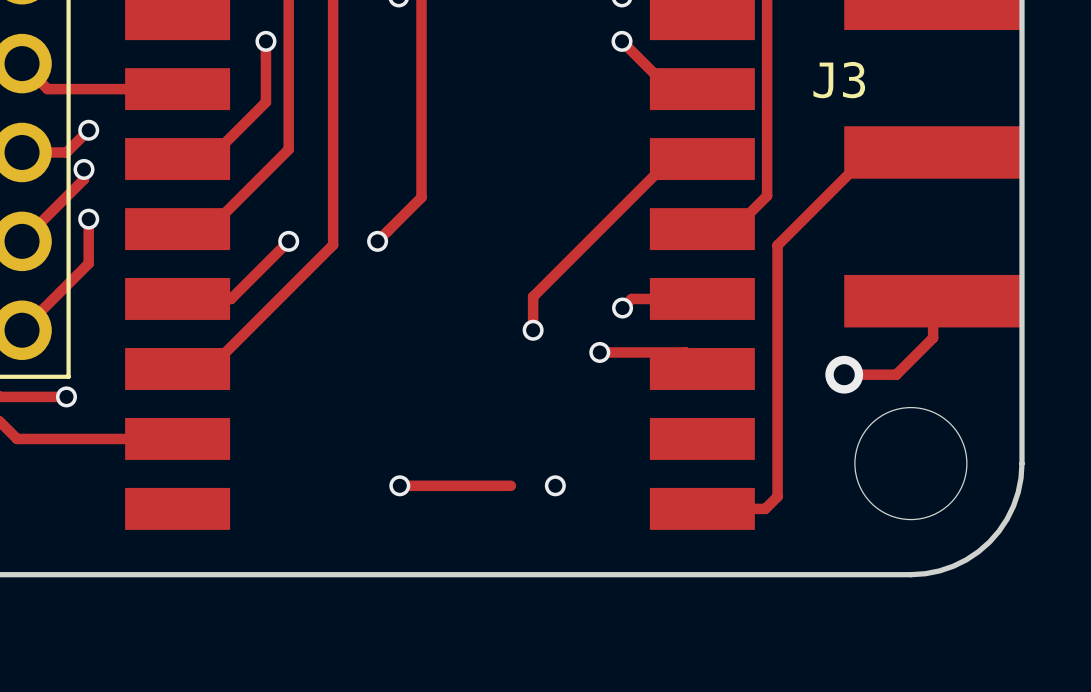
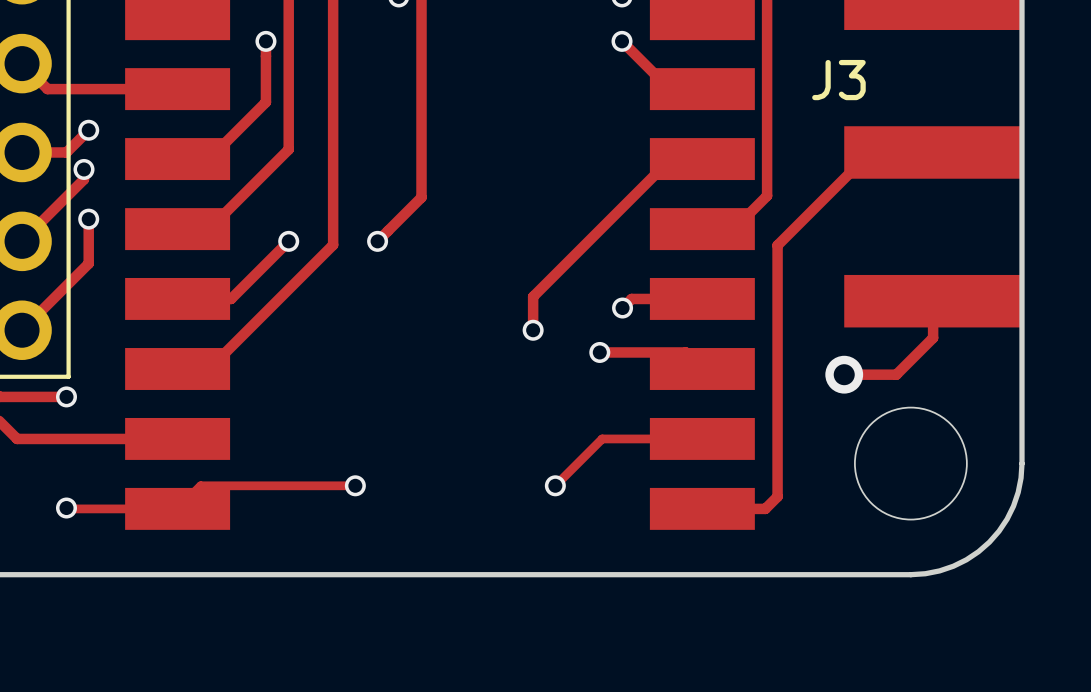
track: none -> (702, 438) (602, 438) (555, 485)
track: none -> (355, 485) (200, 485) (177, 508) (66, 508)
track: (399, 485) (510, 485) -> none
via position: (399, 485) -> (355, 485)
via: none -> (66, 508)

